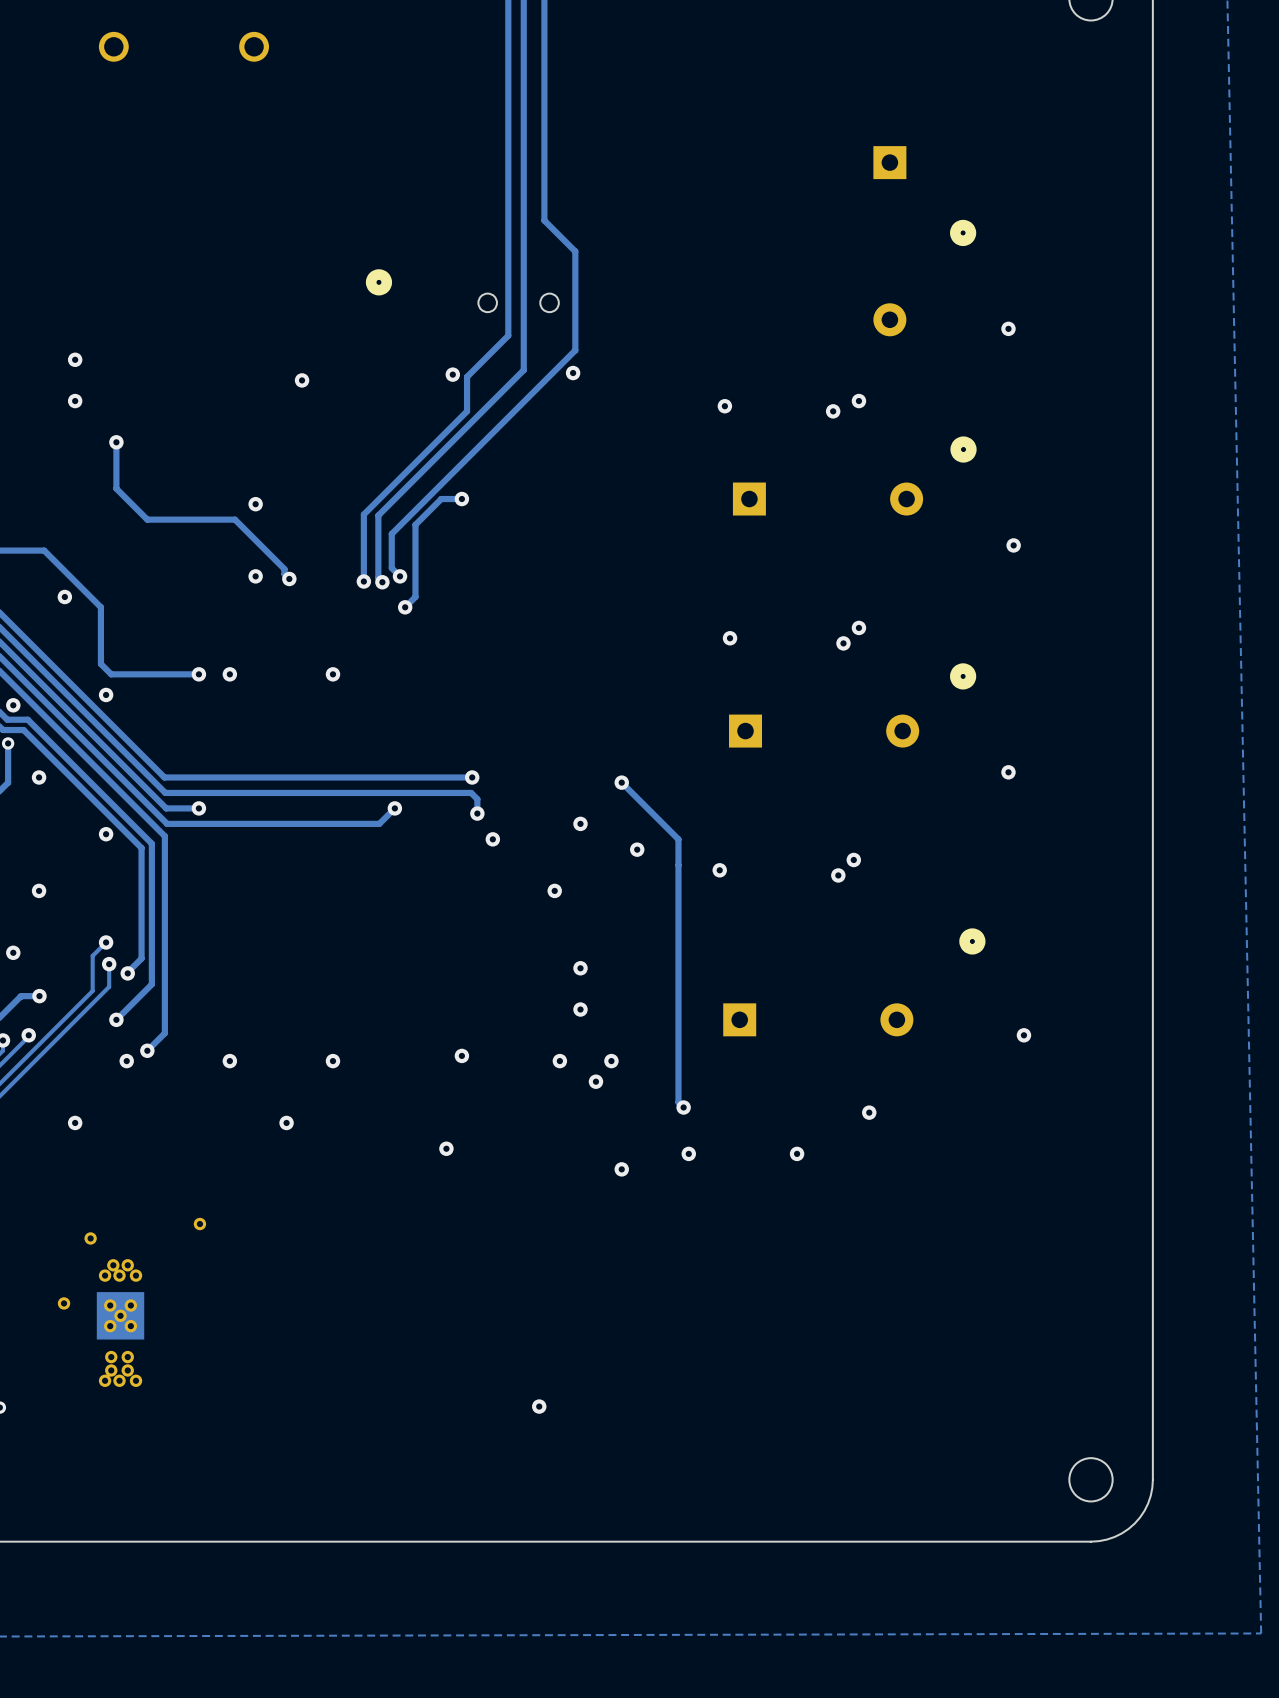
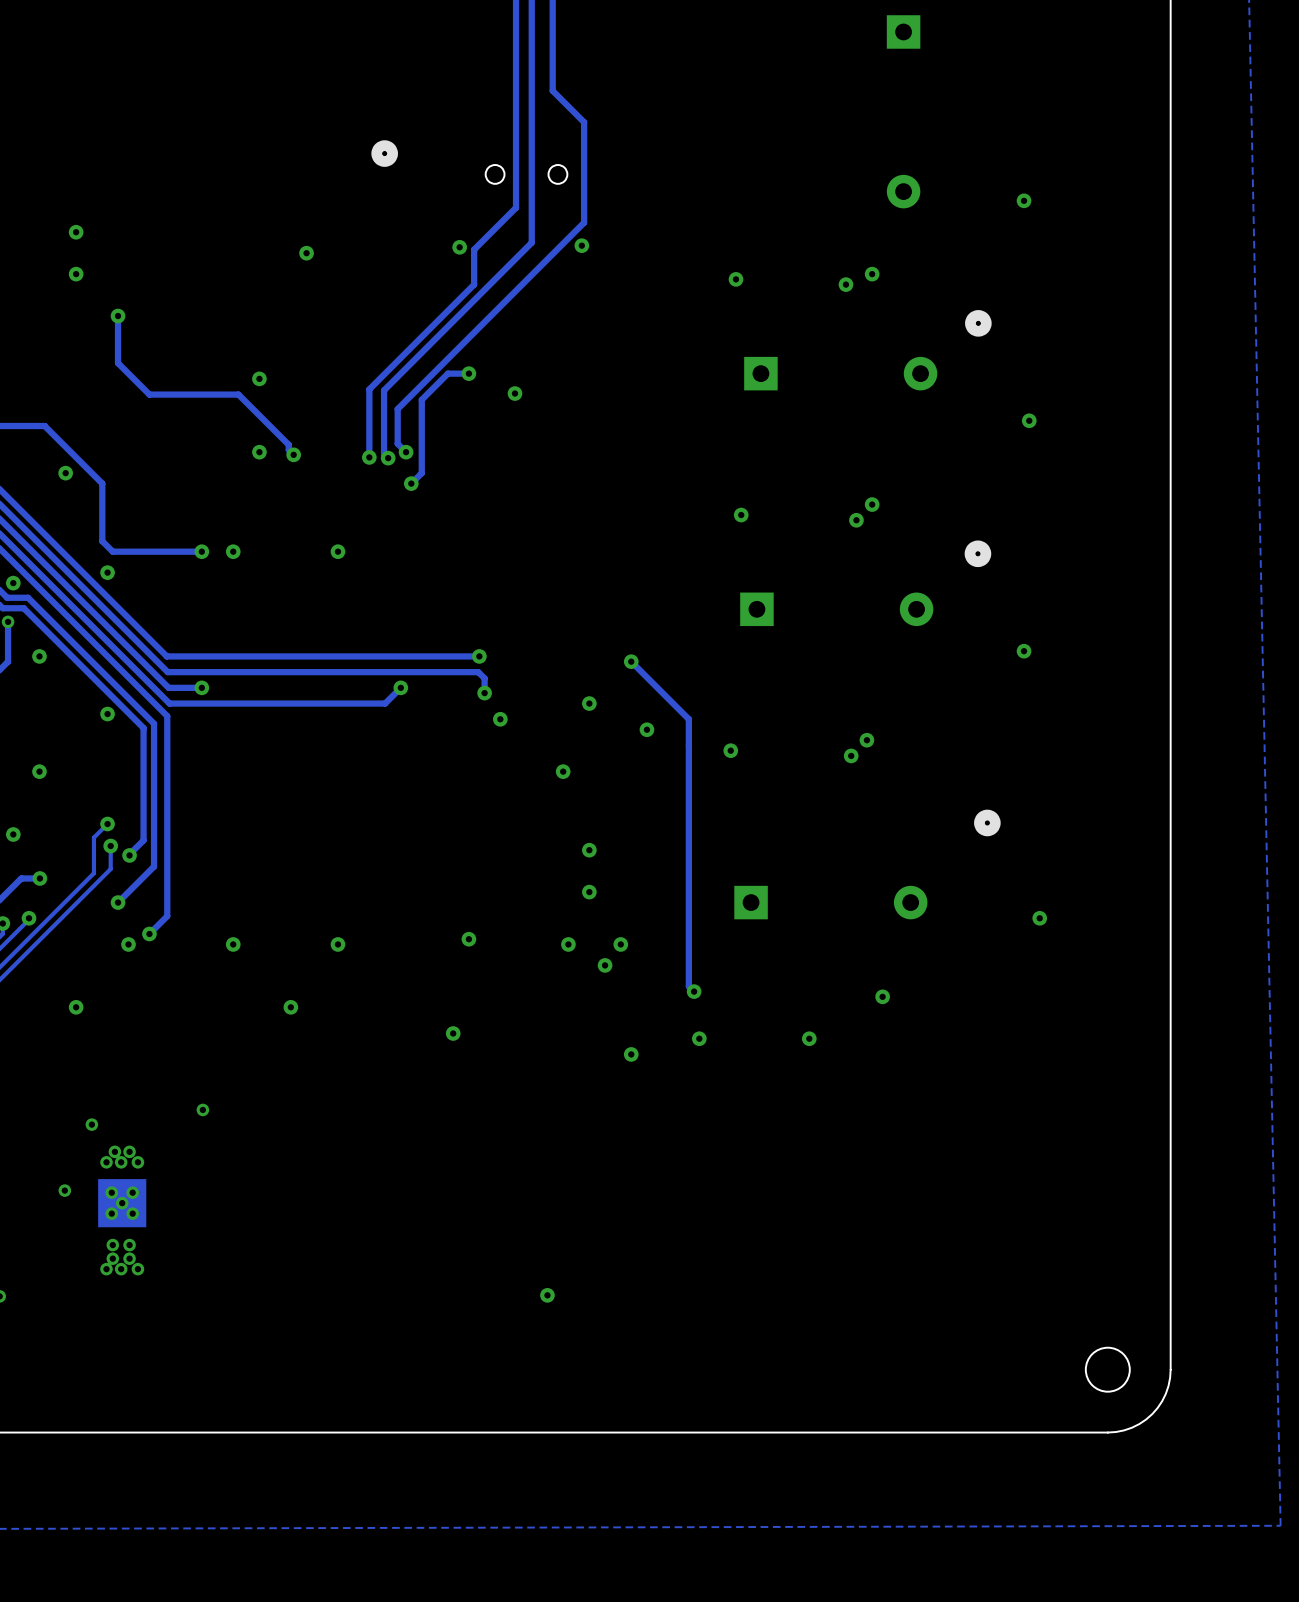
part: (963, 232) -> none
via: none -> (514, 393)

